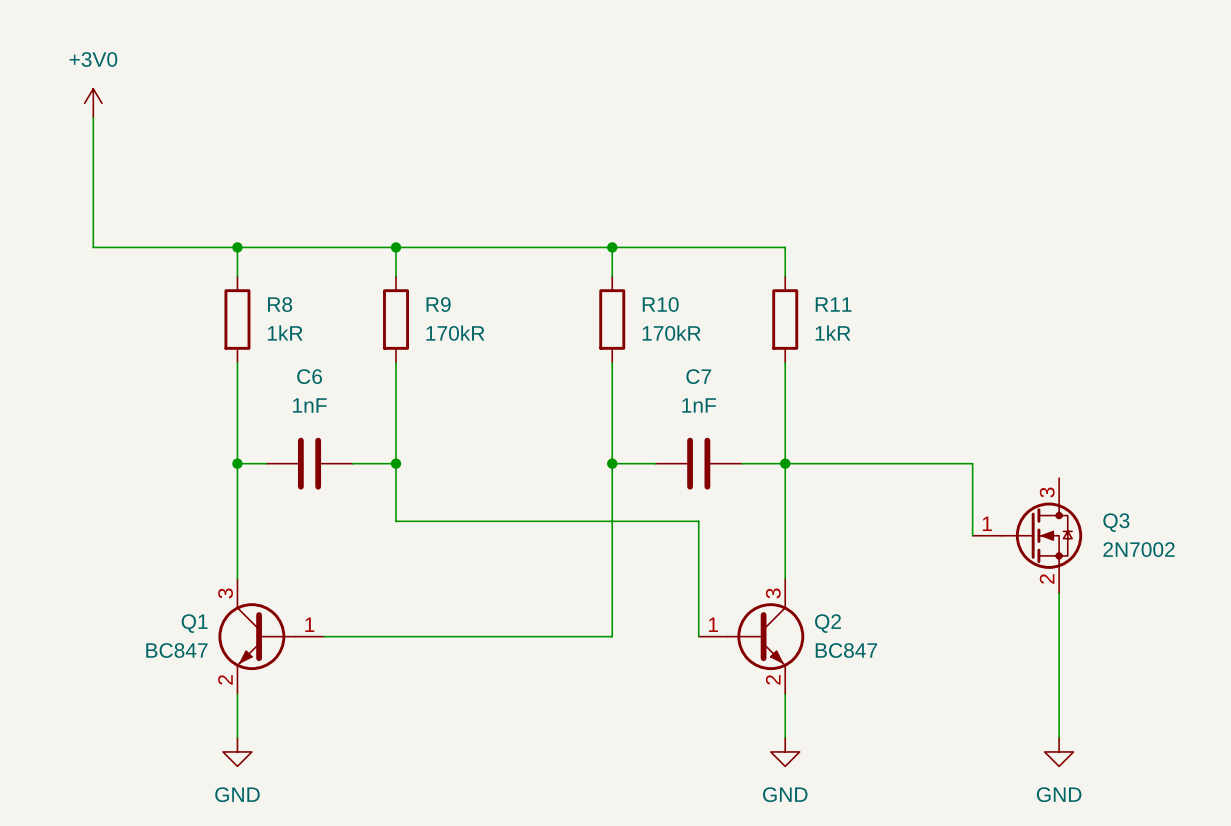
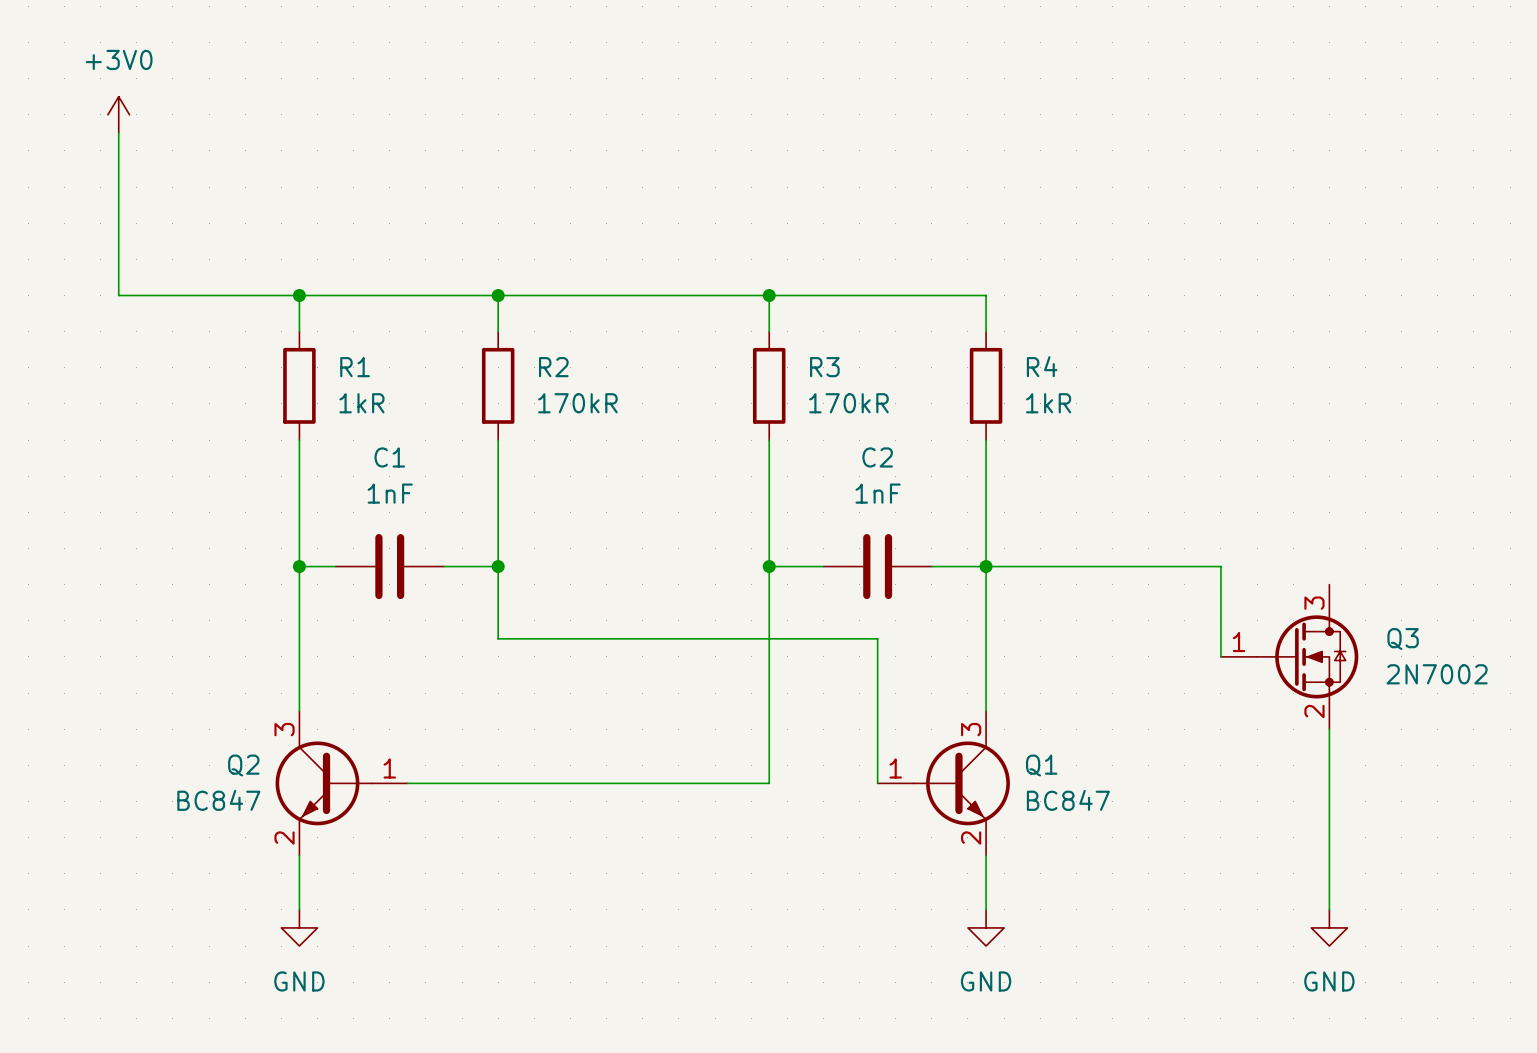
R8 name: R8 (280, 304) -> R1 (355, 367)
R9 name: R9 (438, 304) -> R2 (553, 367)
R10 name: R10 (660, 304) -> R3 (824, 367)
R11 name: R11 (833, 304) -> R4 (1042, 366)
C6 name: C6 (309, 376) -> C1 (389, 457)
C7 name: C7 (698, 376) -> C2 (877, 457)
Q1 name: Q1 (194, 623) -> Q2 (243, 765)
Q2 name: Q2 (827, 623) -> Q1 (1041, 765)

